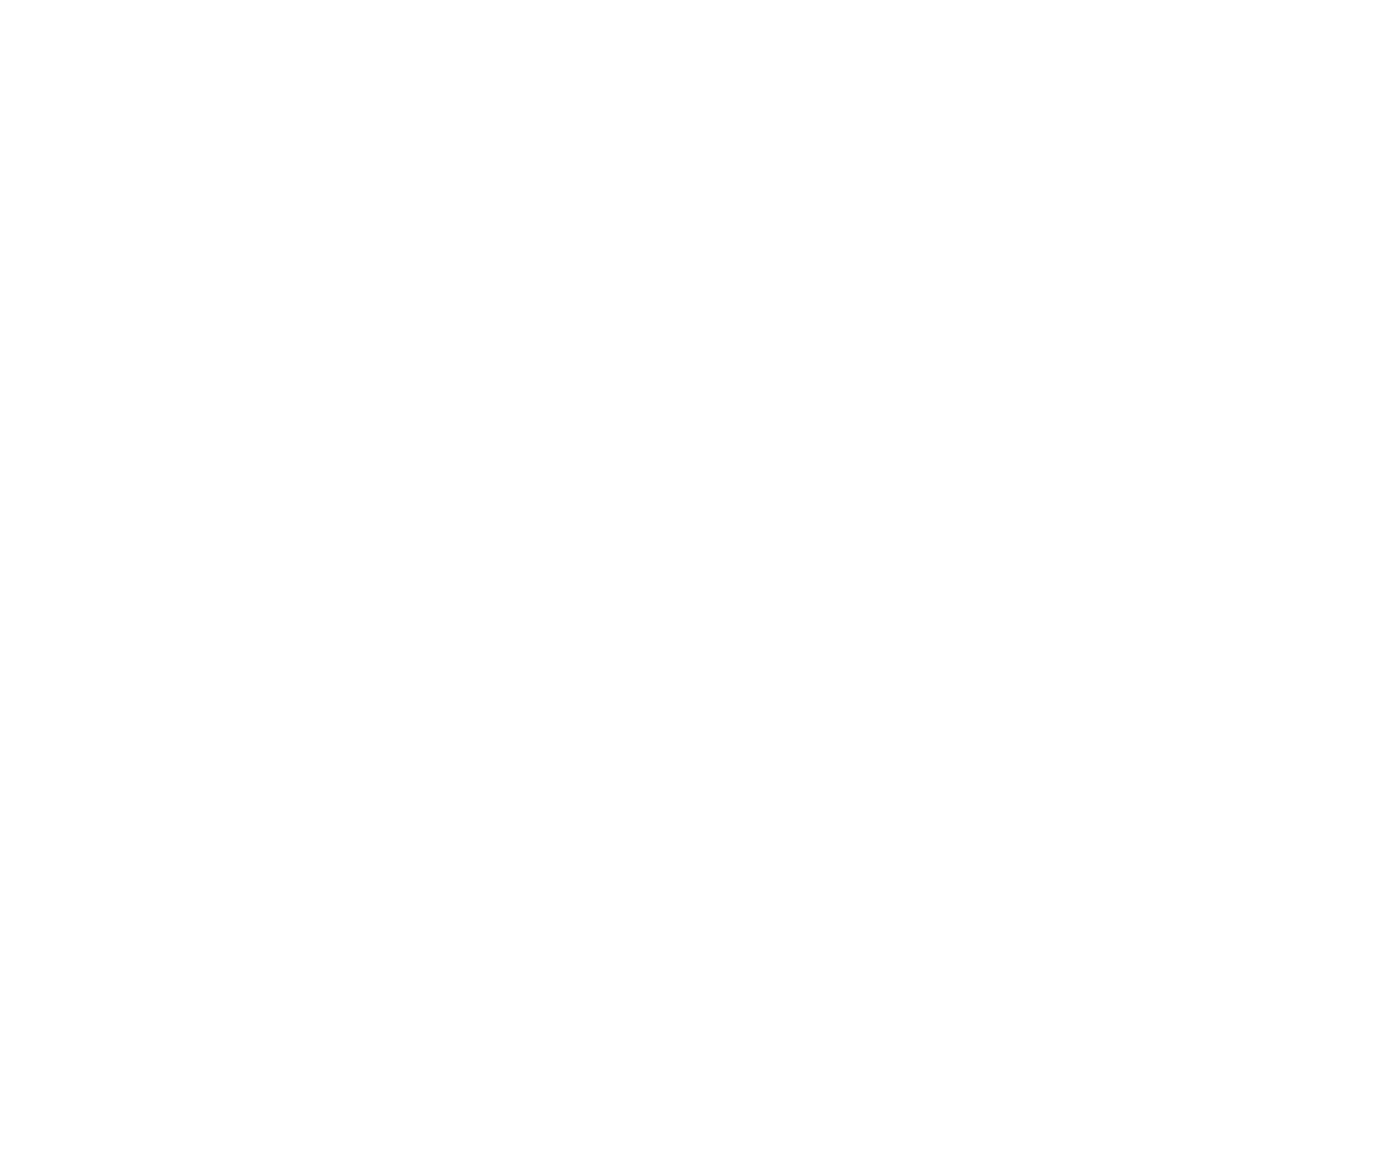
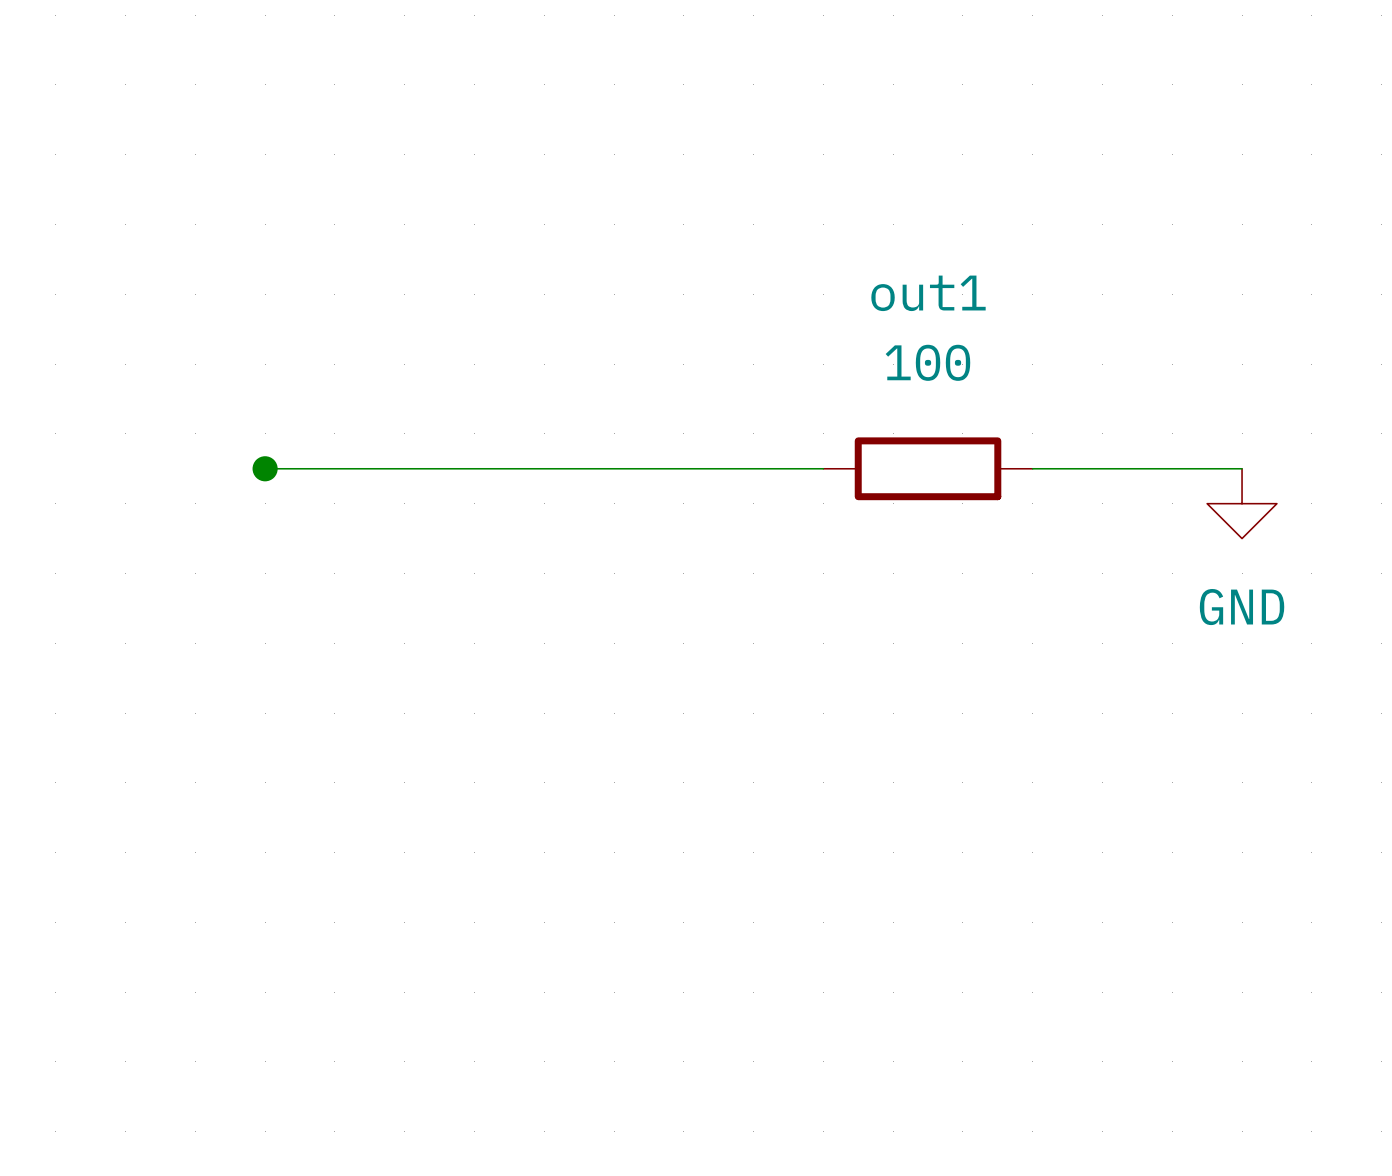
wire: none -> (265, 468) (823, 468)
junction: none -> (265, 468)
out1: none -> 100 (928, 468)
wire: none -> (1032, 468) (1242, 468)
power symbol: none -> GND (1242, 503)

